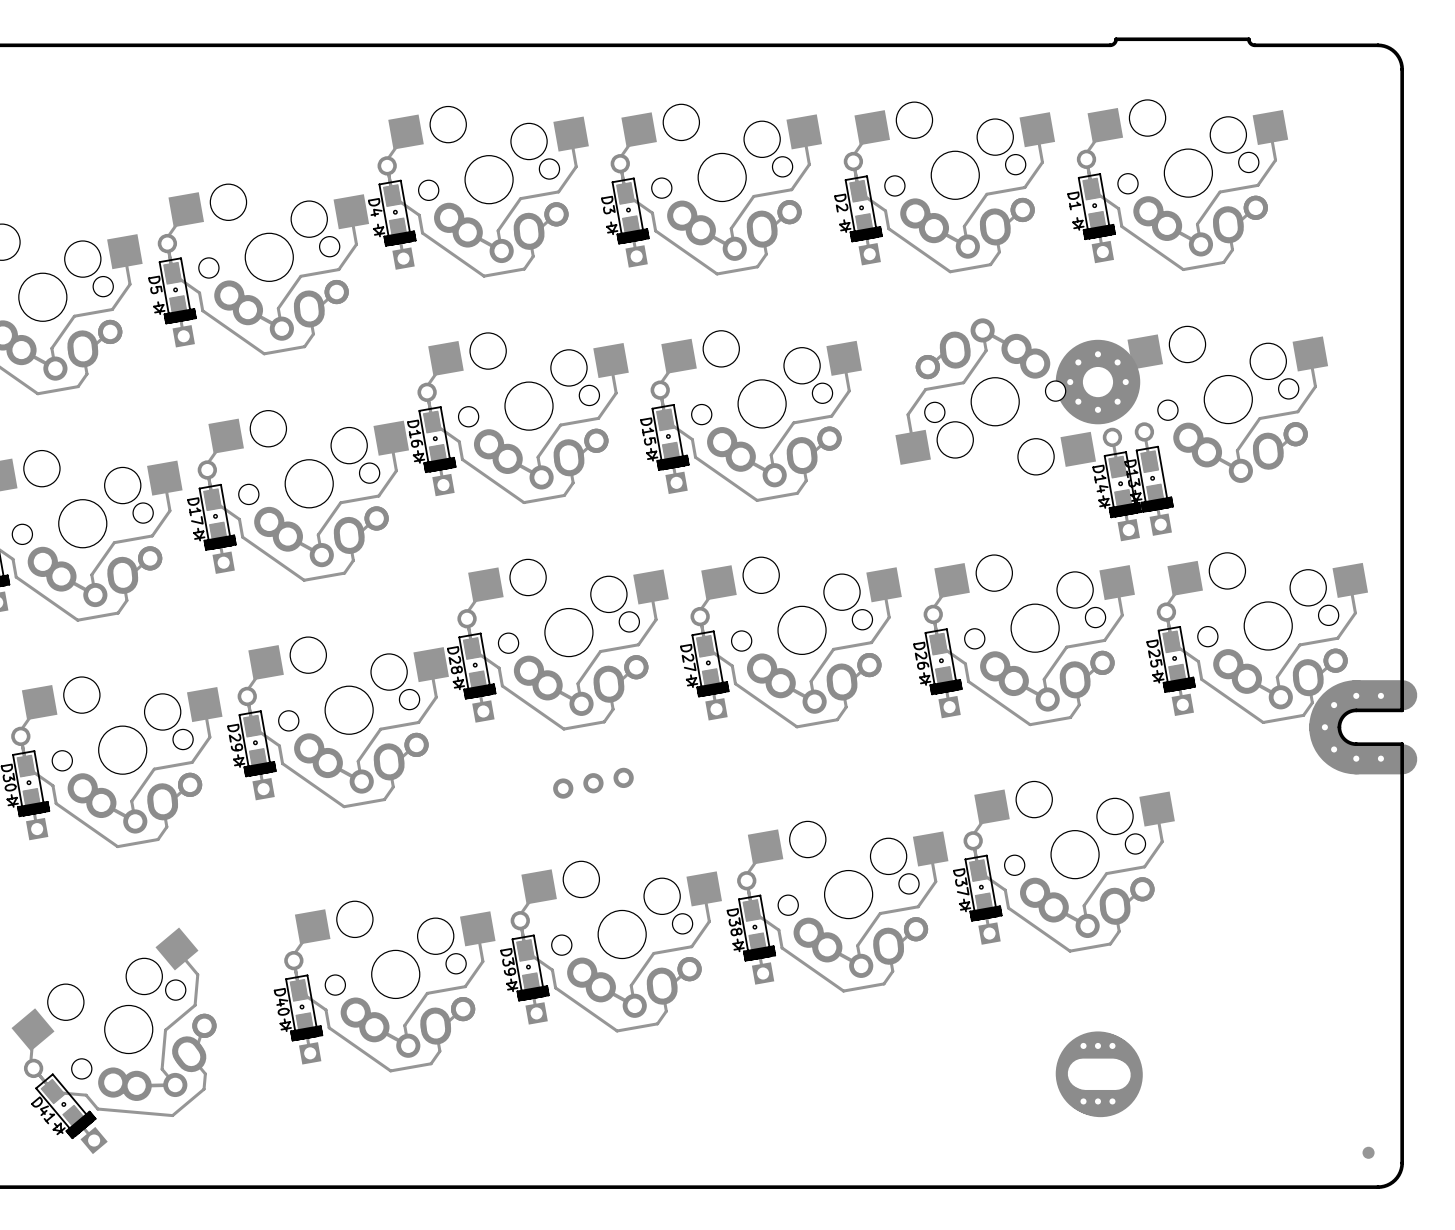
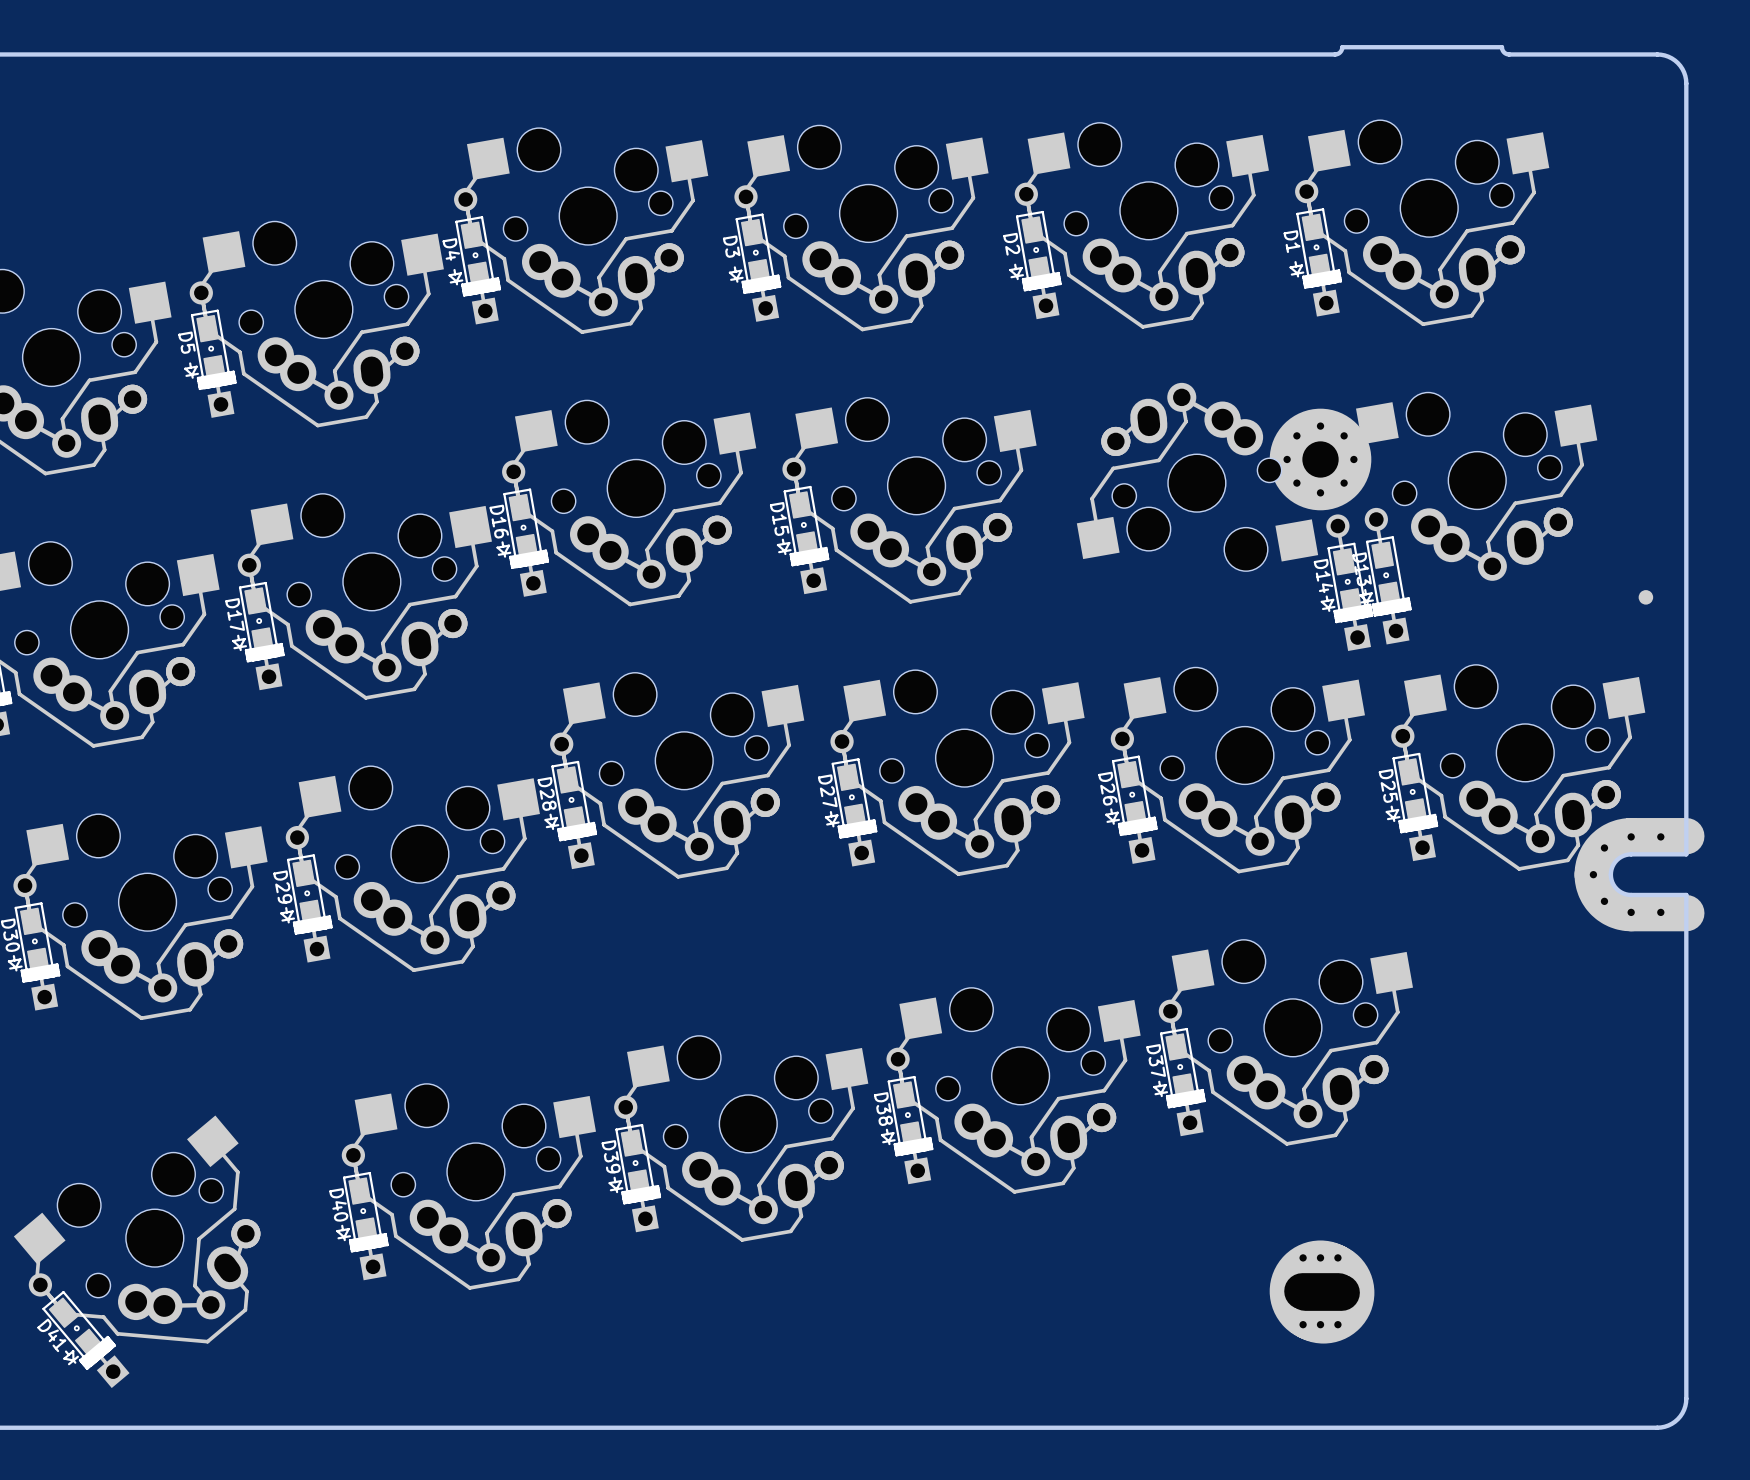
part: none -> (1645, 597)
part: (593, 783) -> none
part: (1368, 1152) -> none

